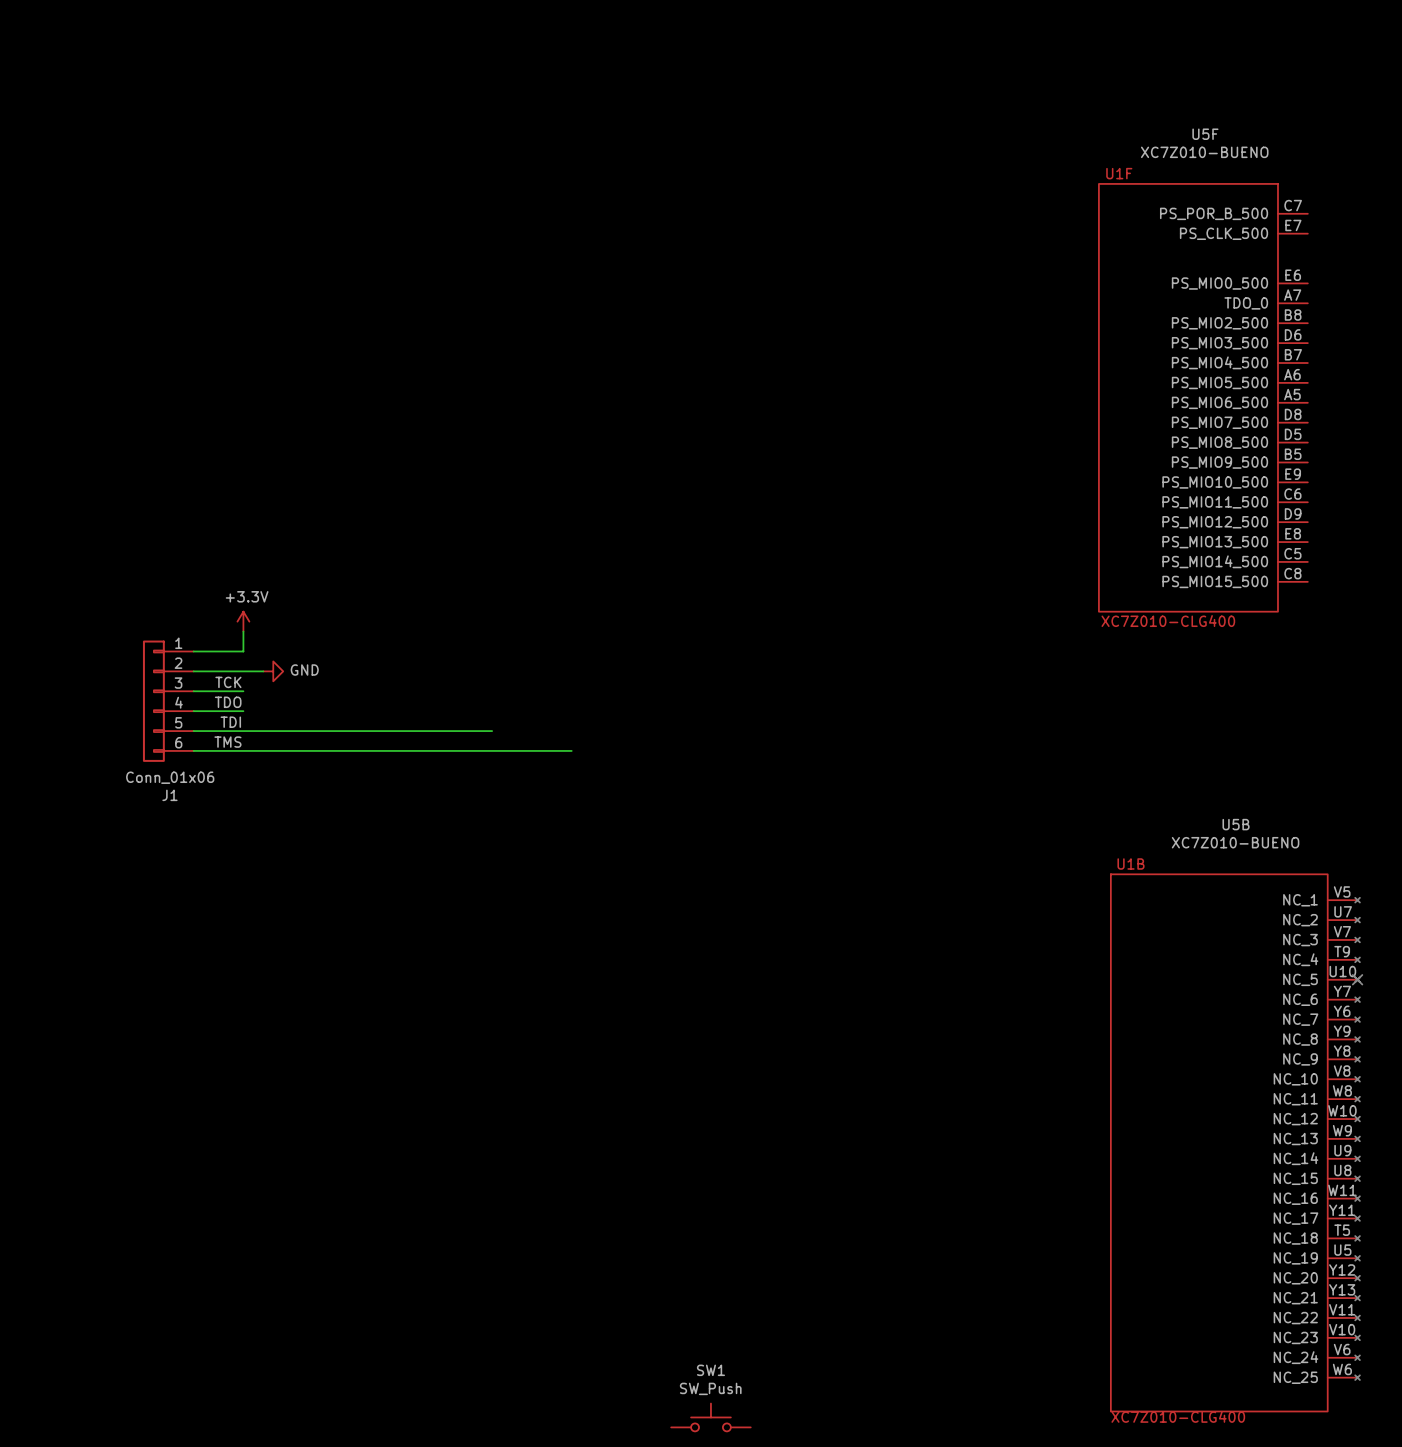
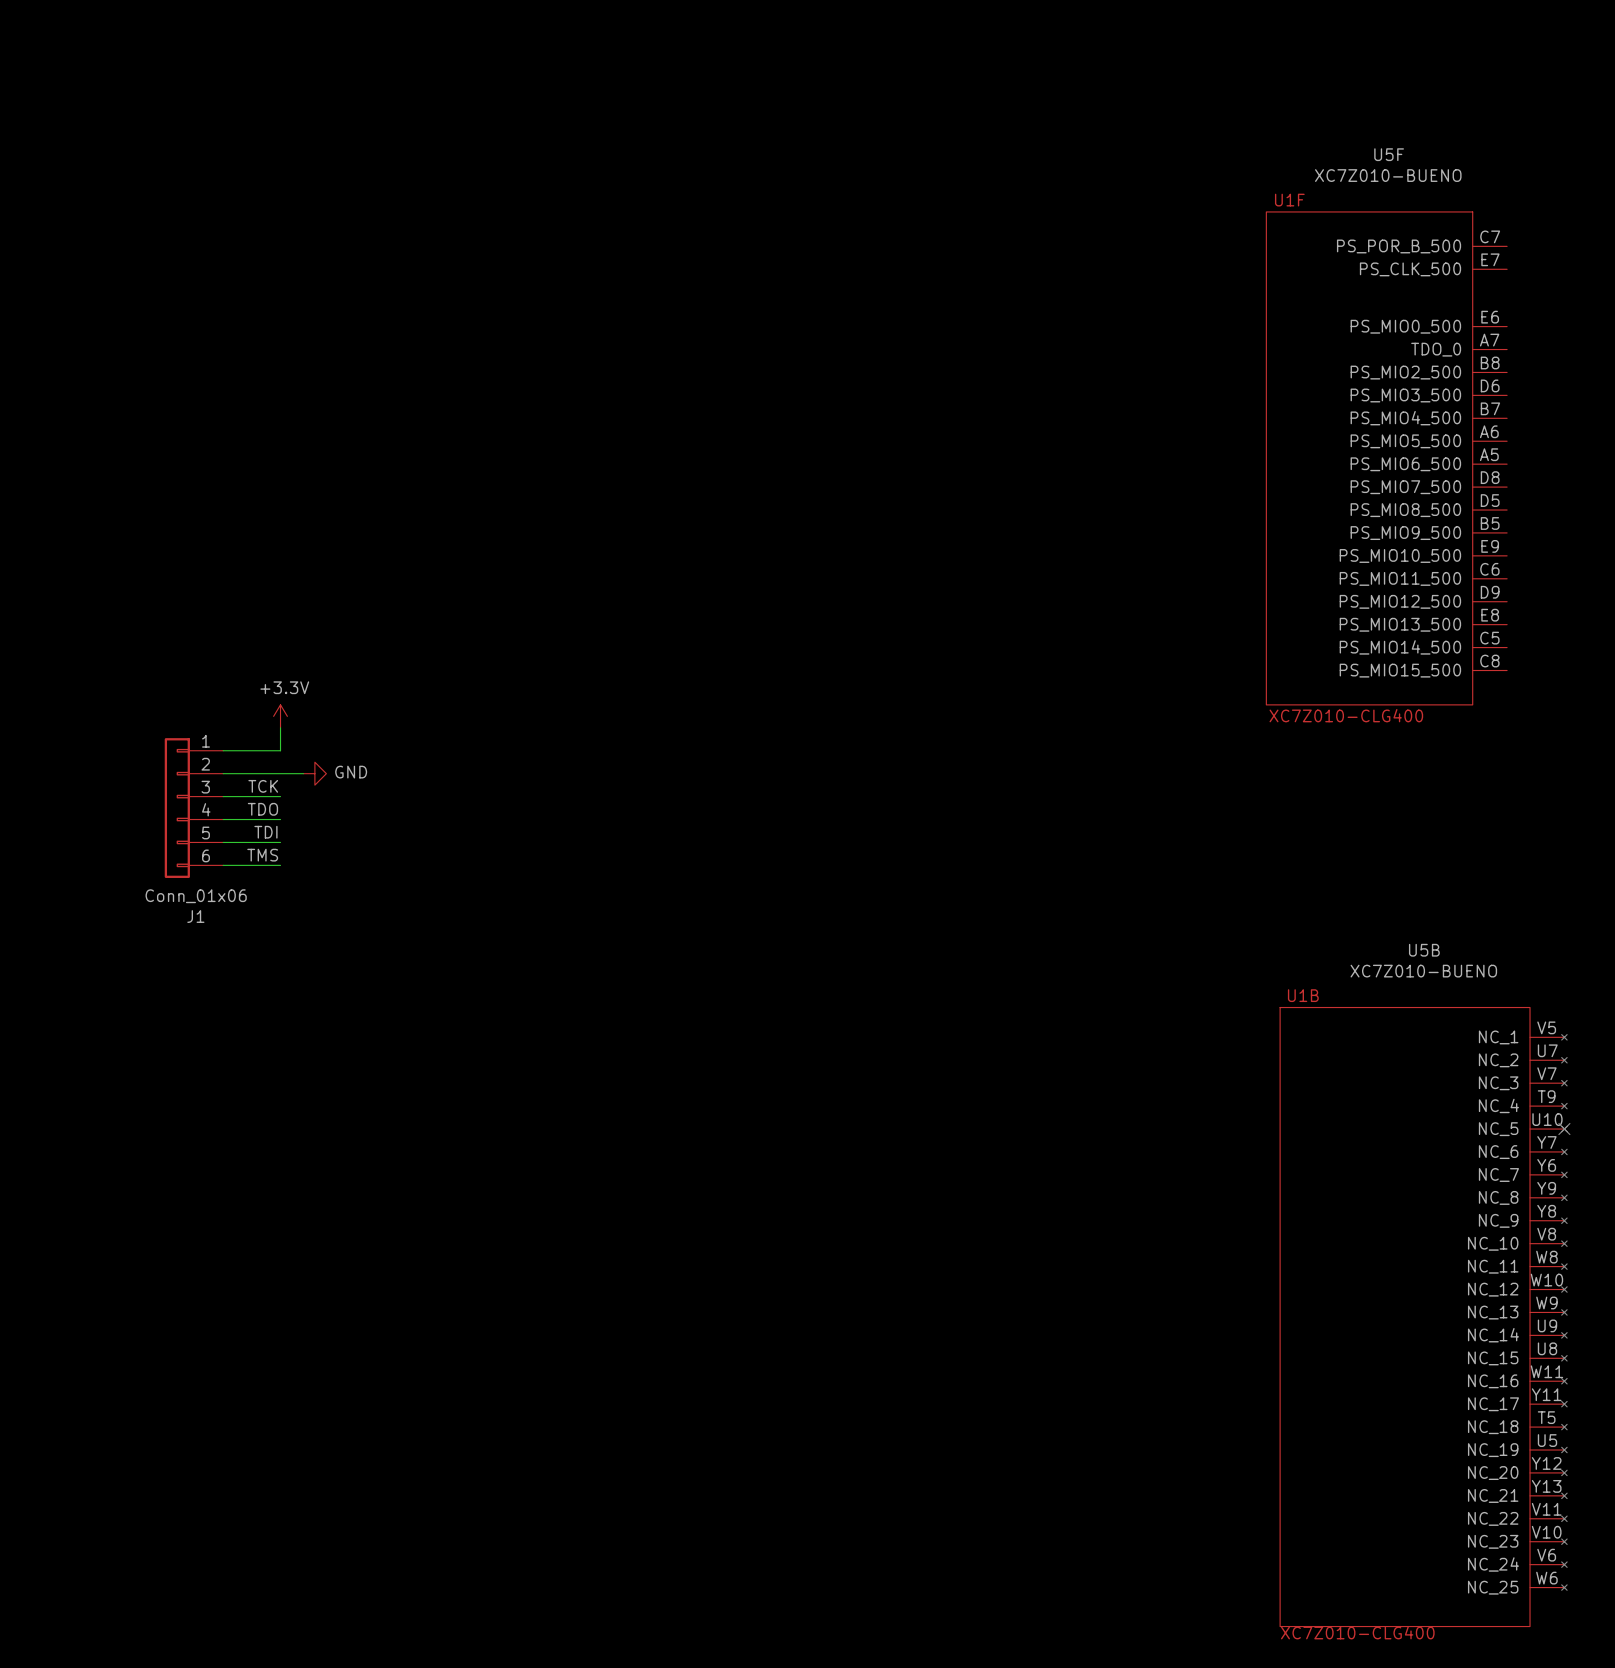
wire: (243, 731) (492, 731) -> none
wire: (243, 750) (571, 750) -> none
SW1: SW_Push (710, 1417) -> none

